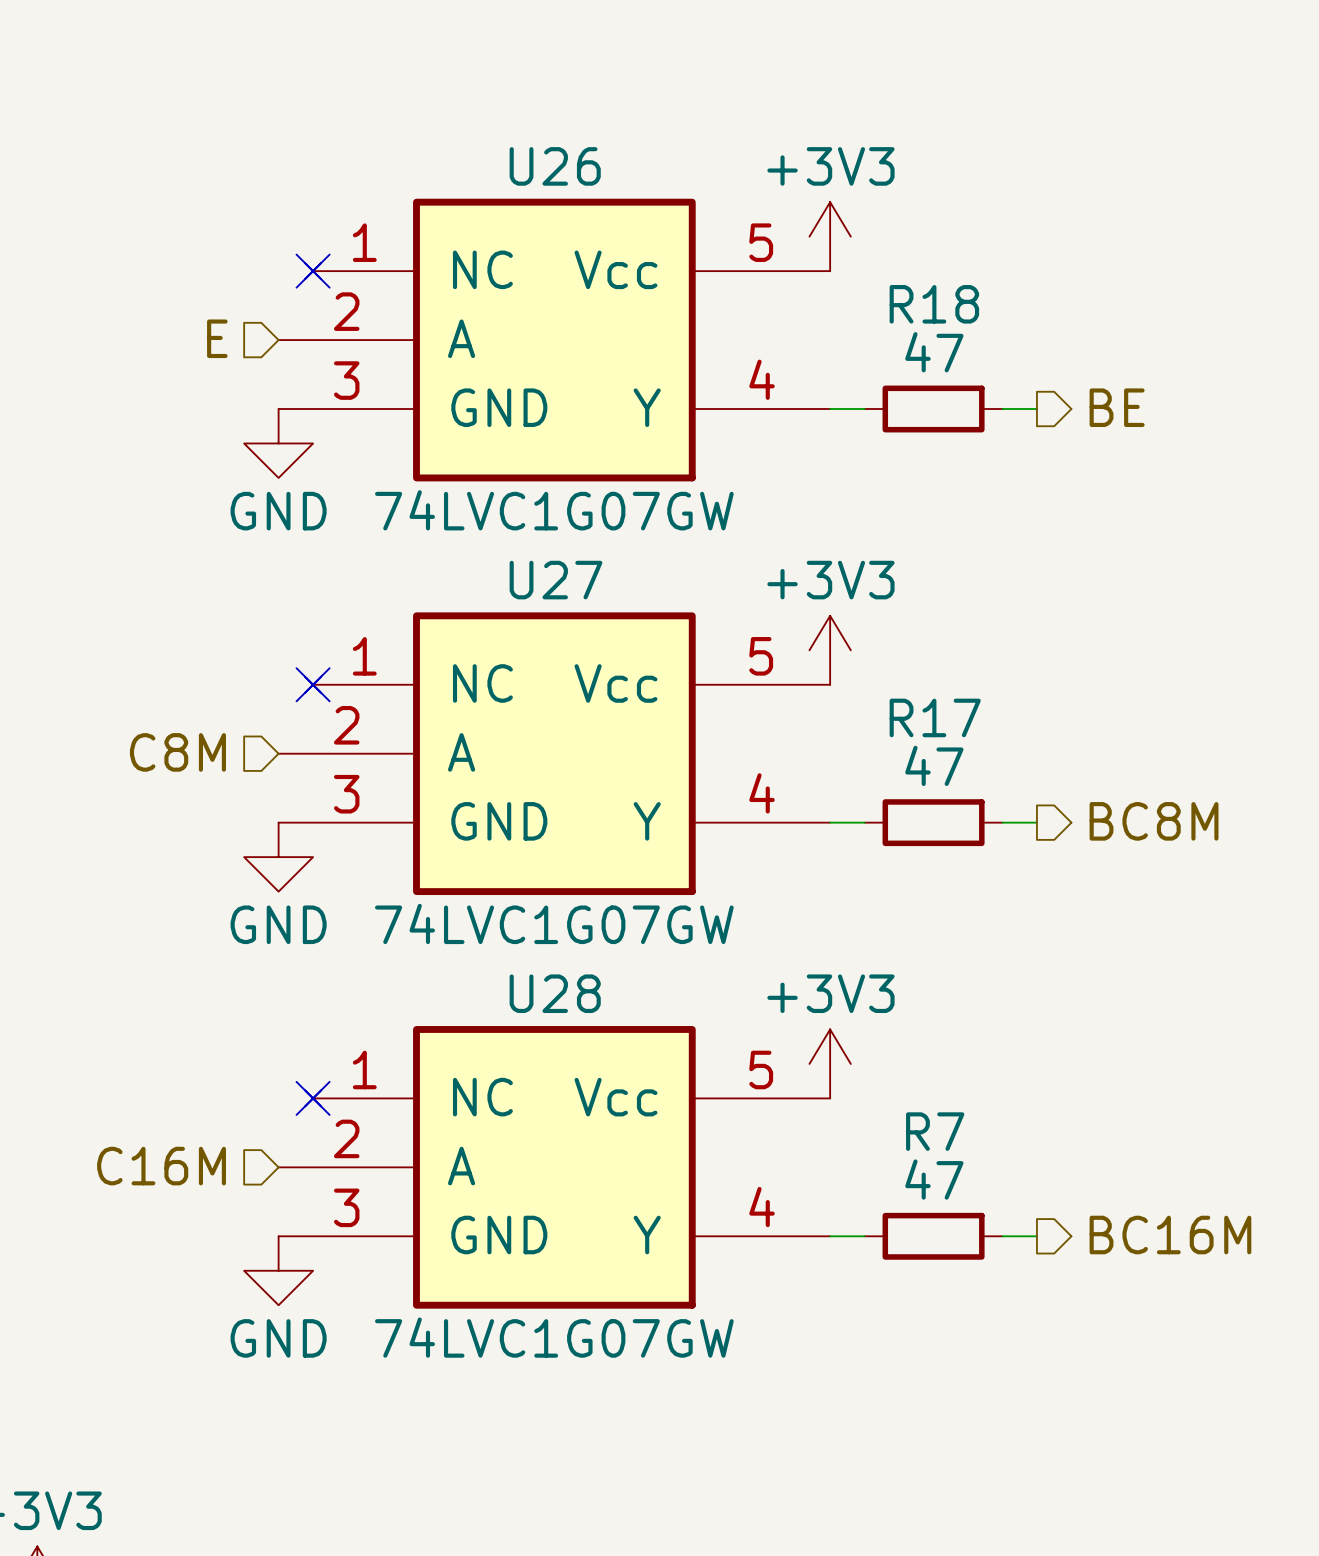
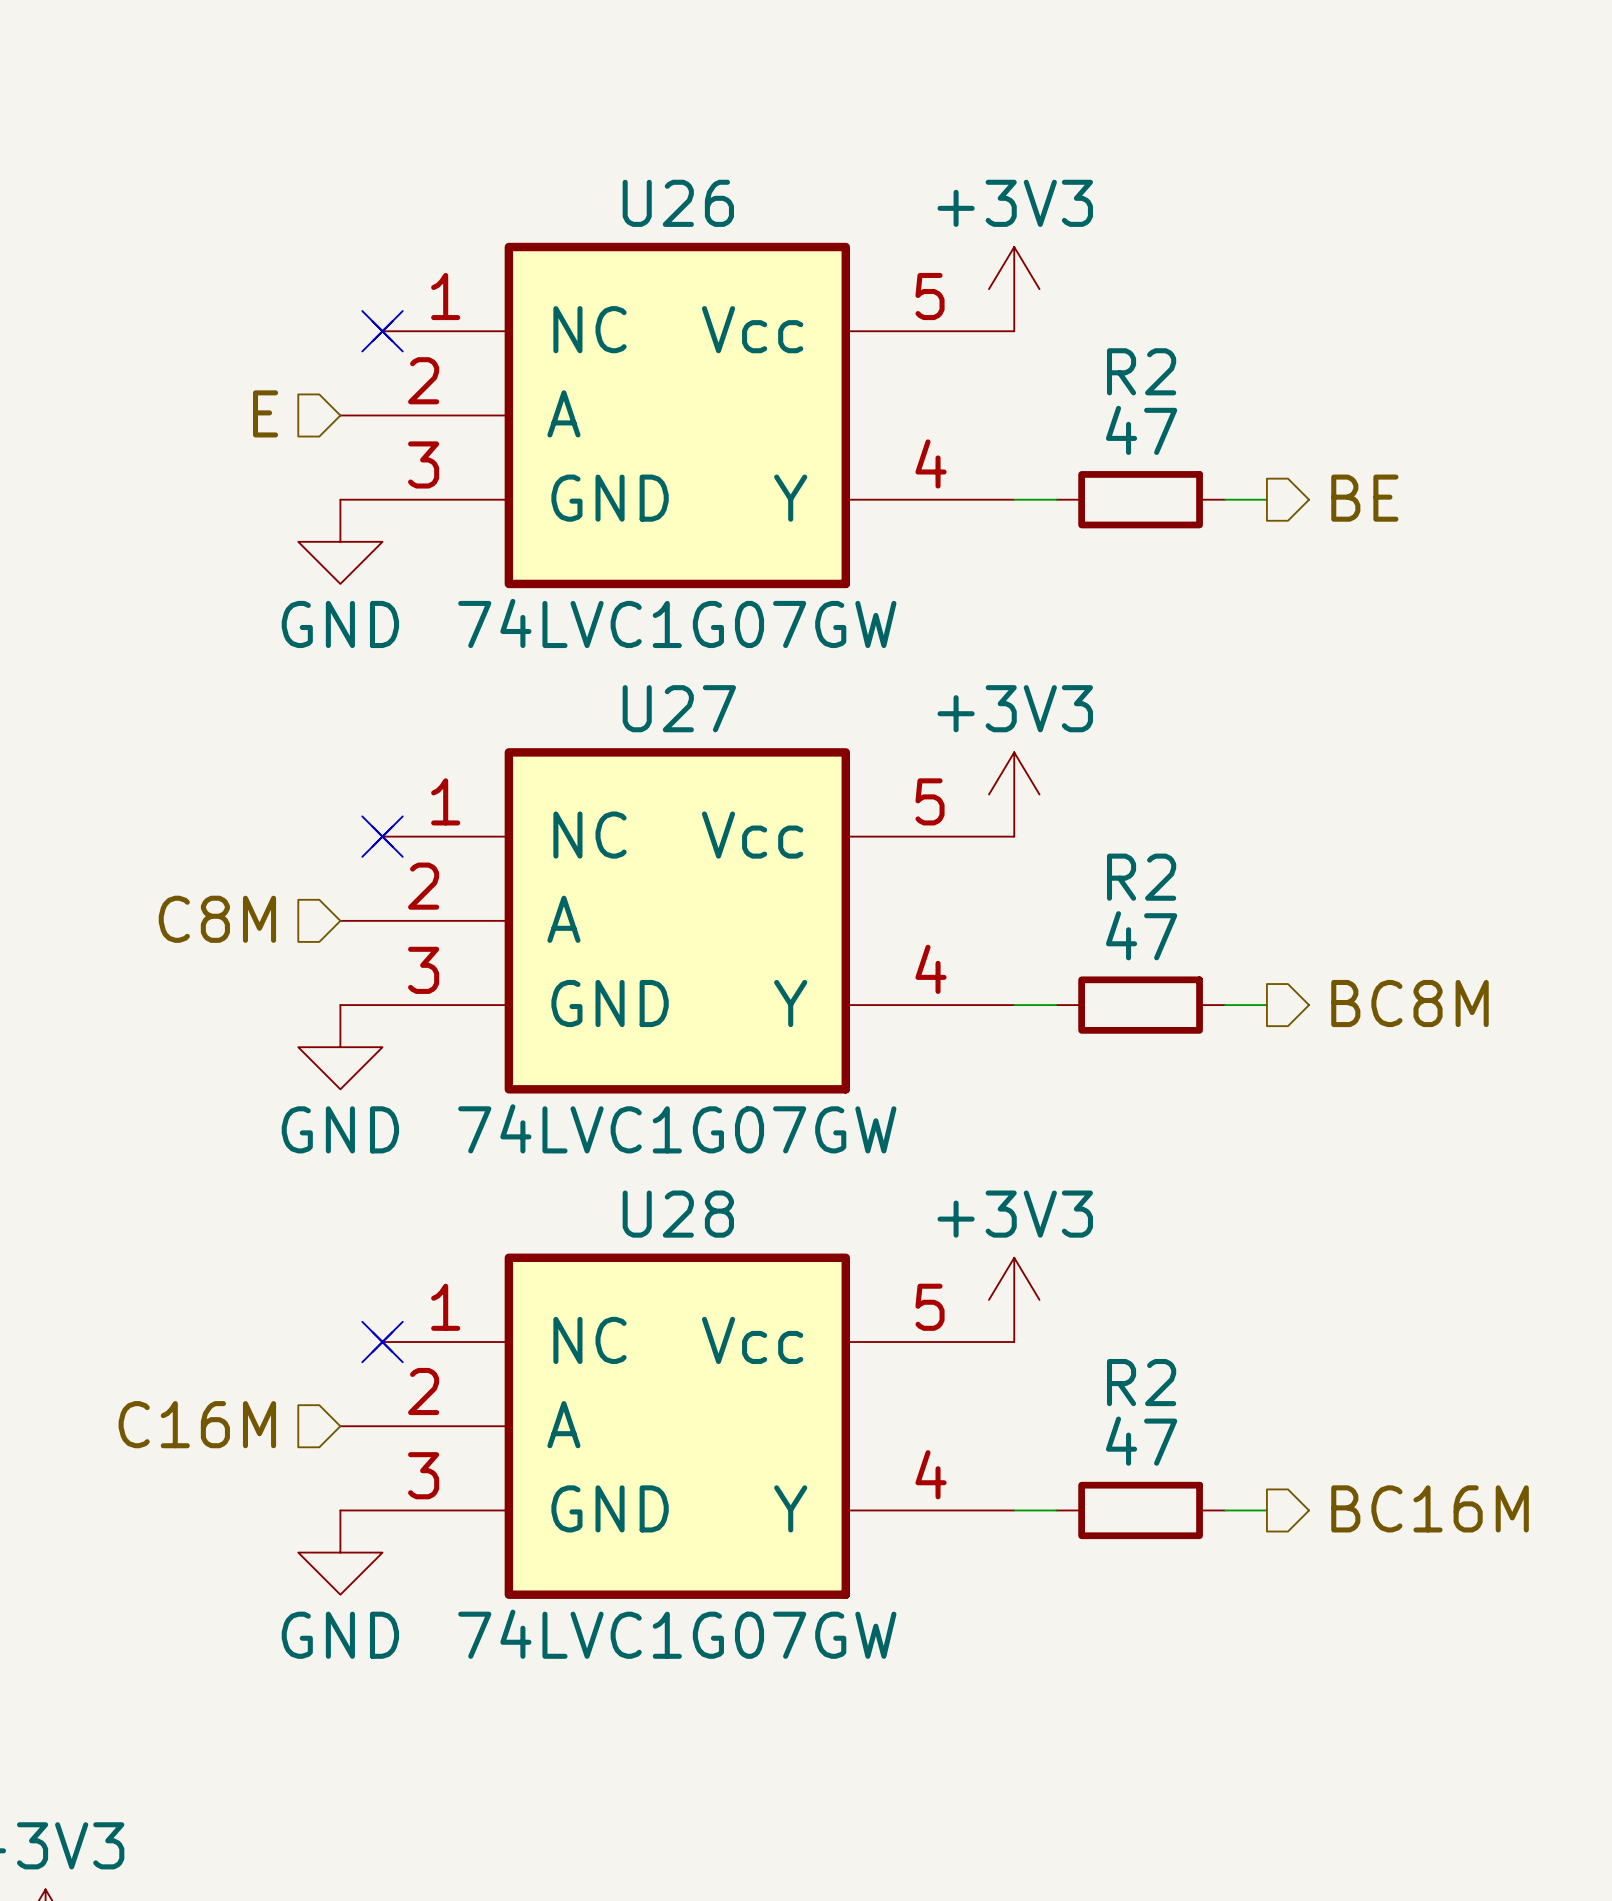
R18 name: R18 (934, 304) -> R2 (1141, 371)
R17 name: R17 (935, 717) -> R2 (1141, 877)
R7 name: R7 (935, 1131) -> R2 (1141, 1382)

